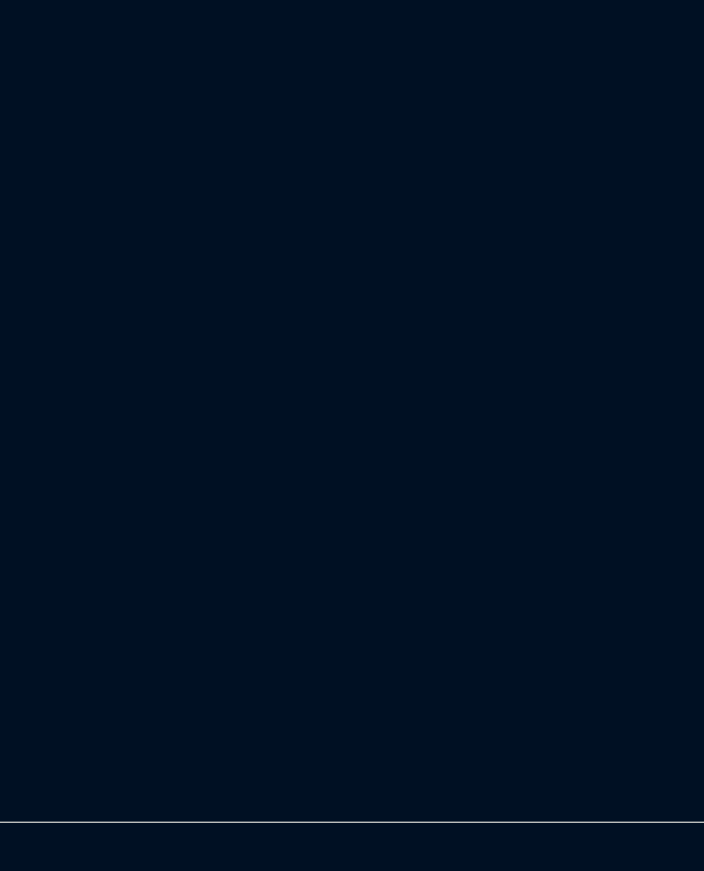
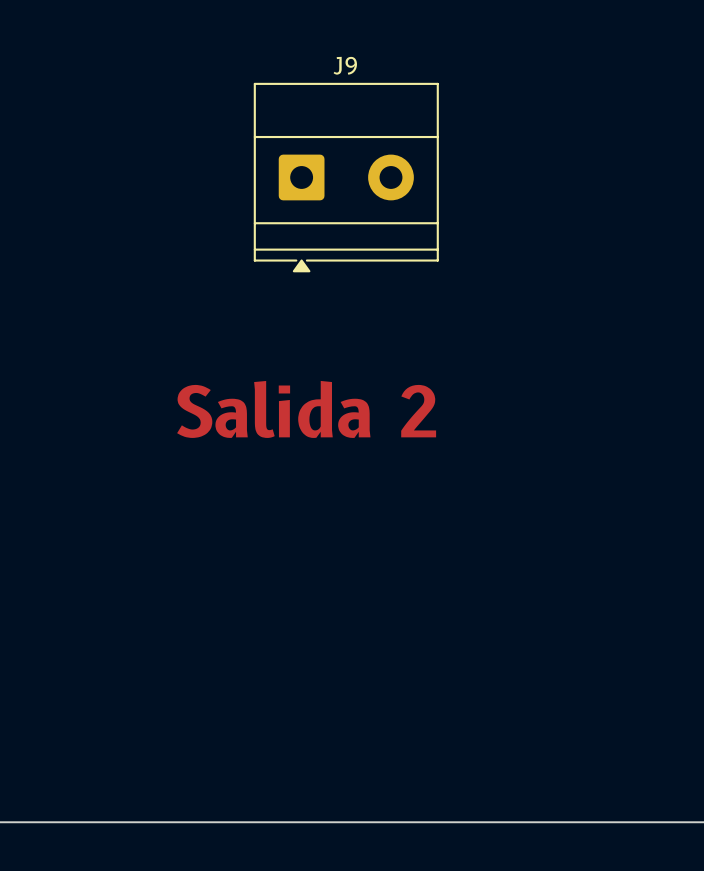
J9: none -> (346, 177)
text: none -> Salida 2 (306, 409)

